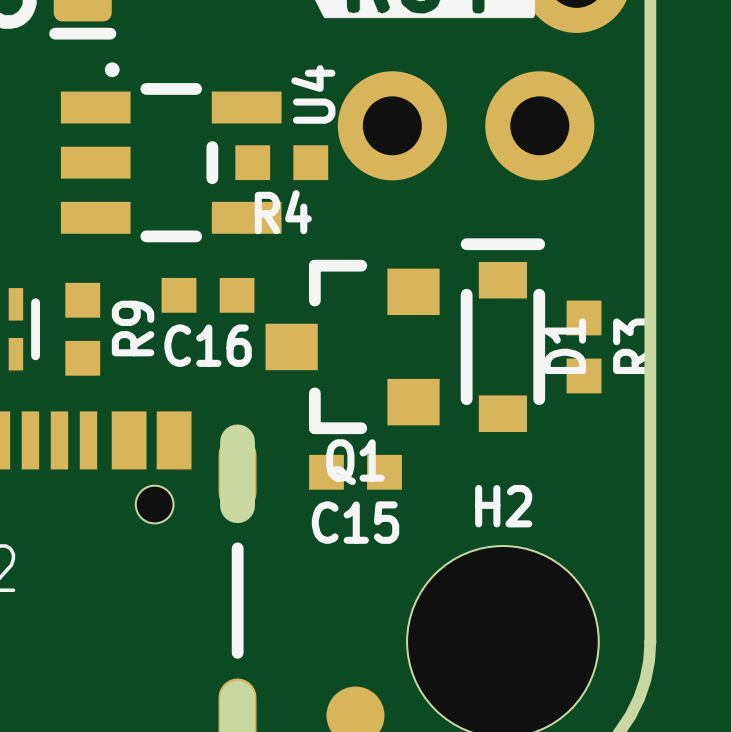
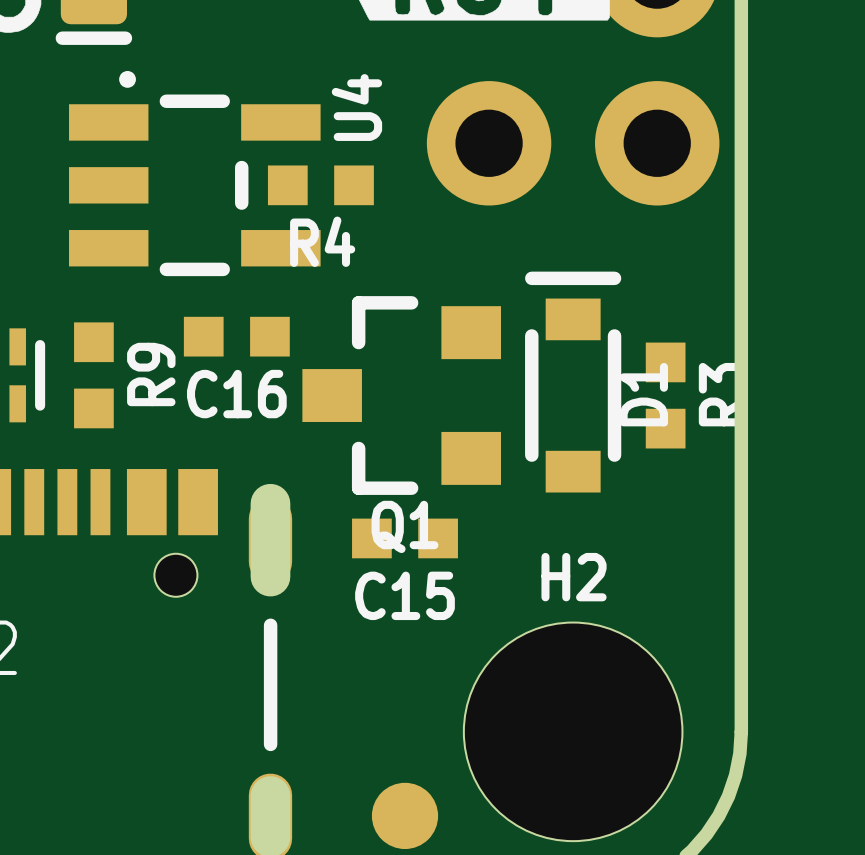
part position: (466, 125) -> (573, 143)

